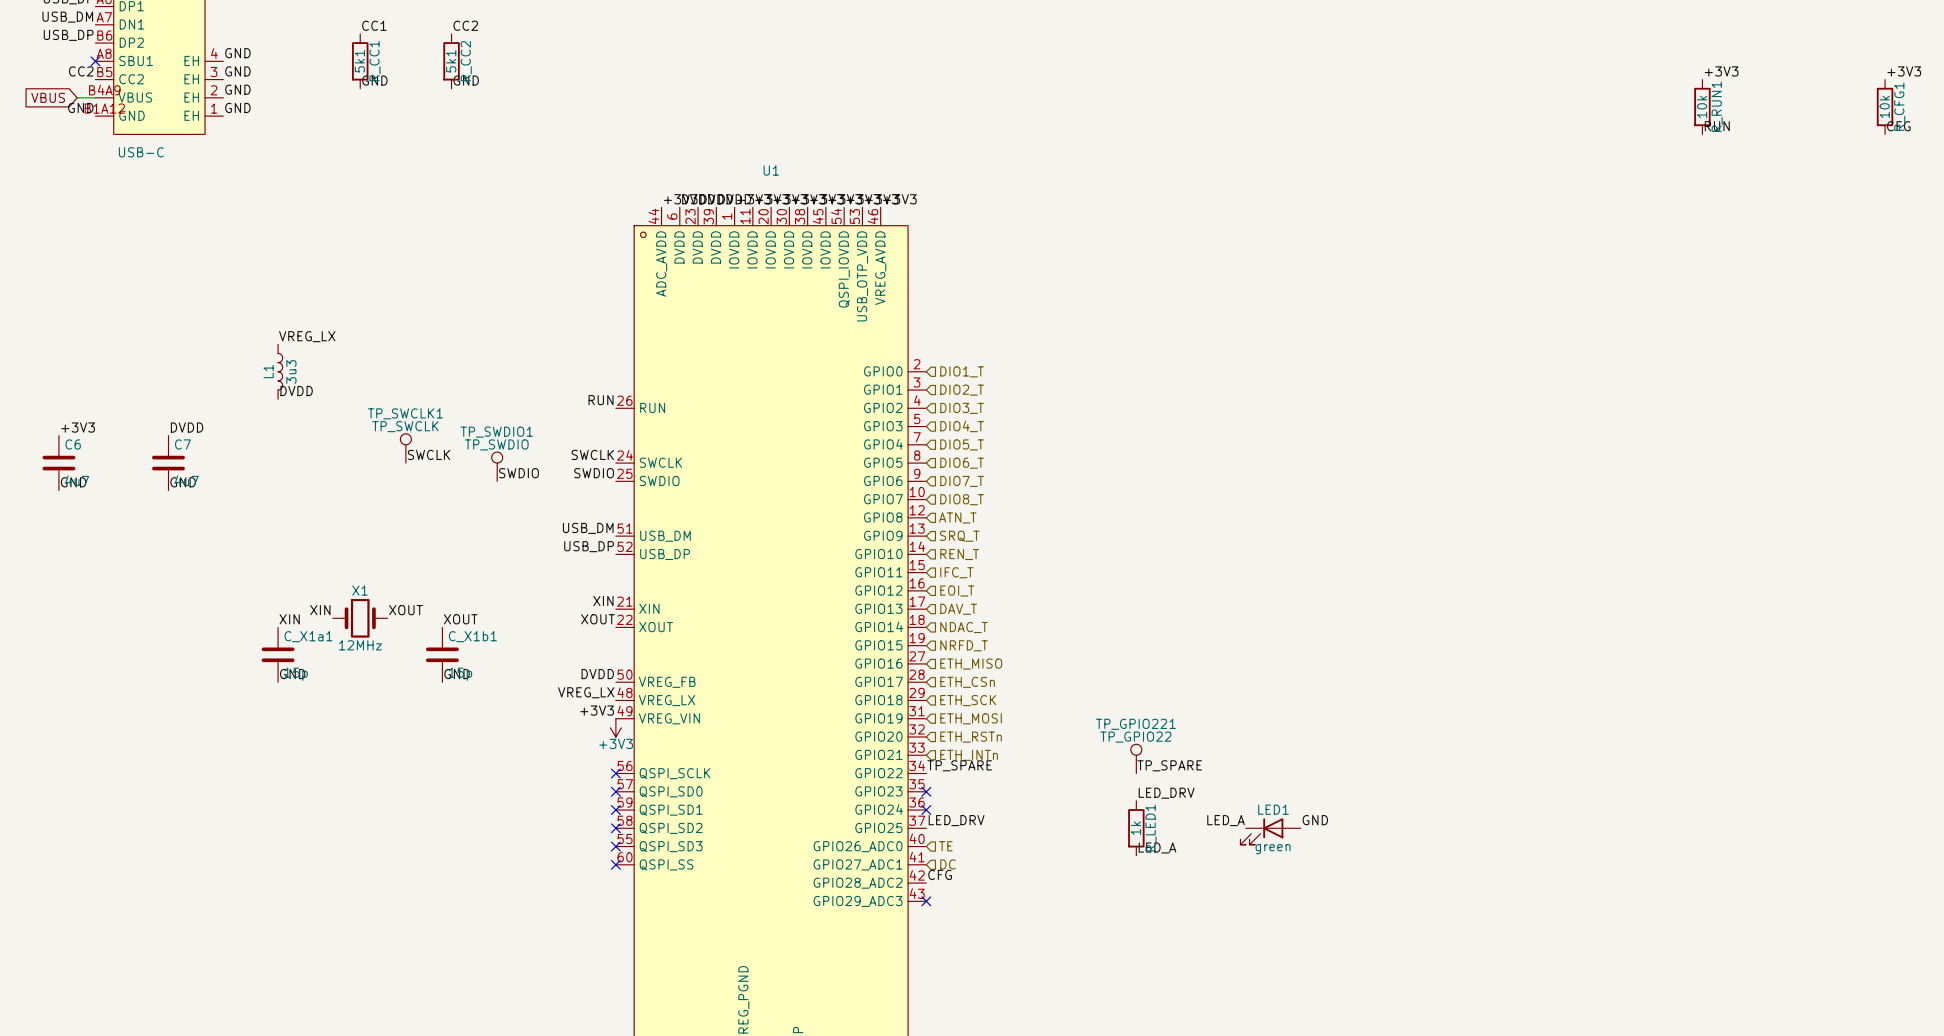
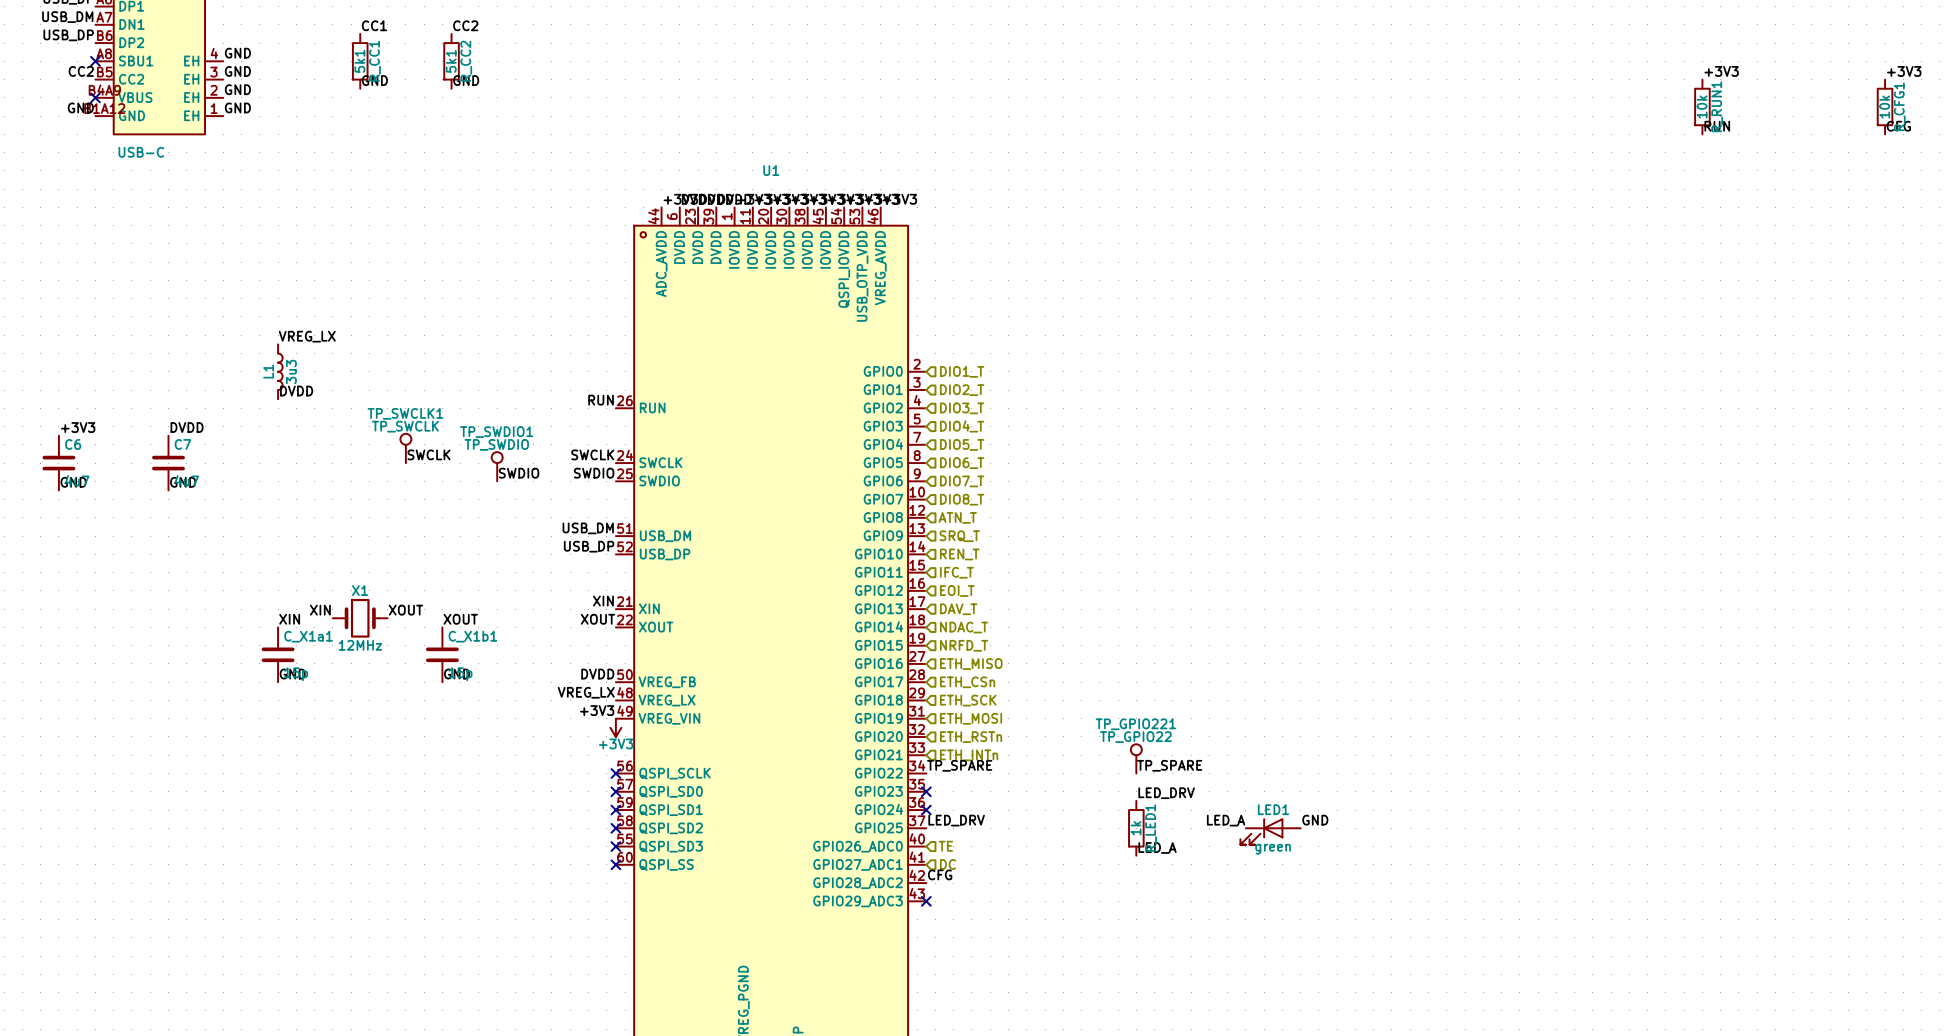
global label: VBUS (48, 97) -> none
wire: (77, 97) (95, 97) -> none
no-connect mark: none -> (95, 97)

